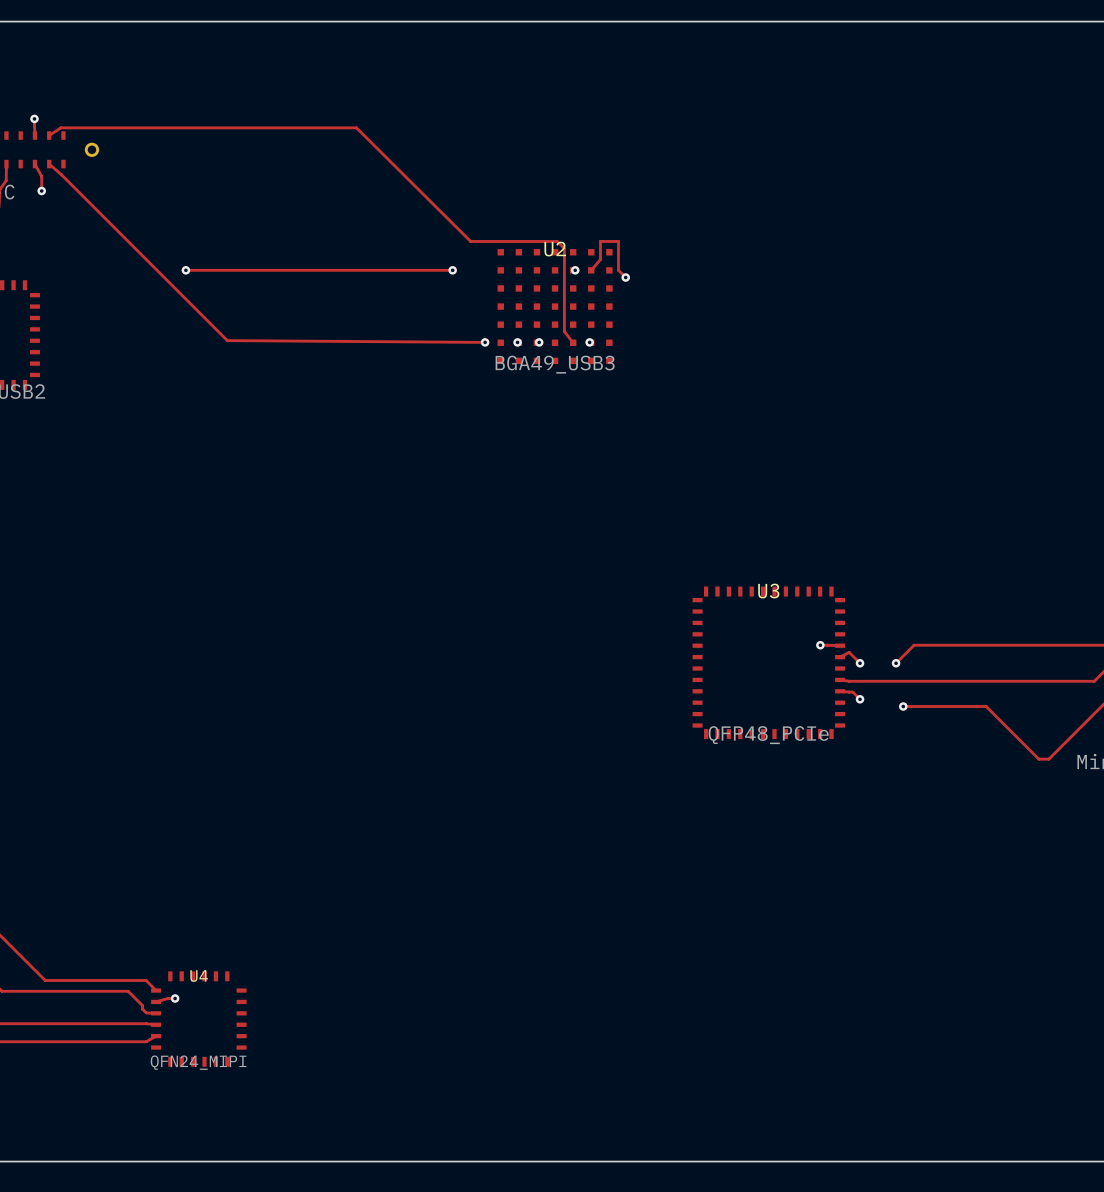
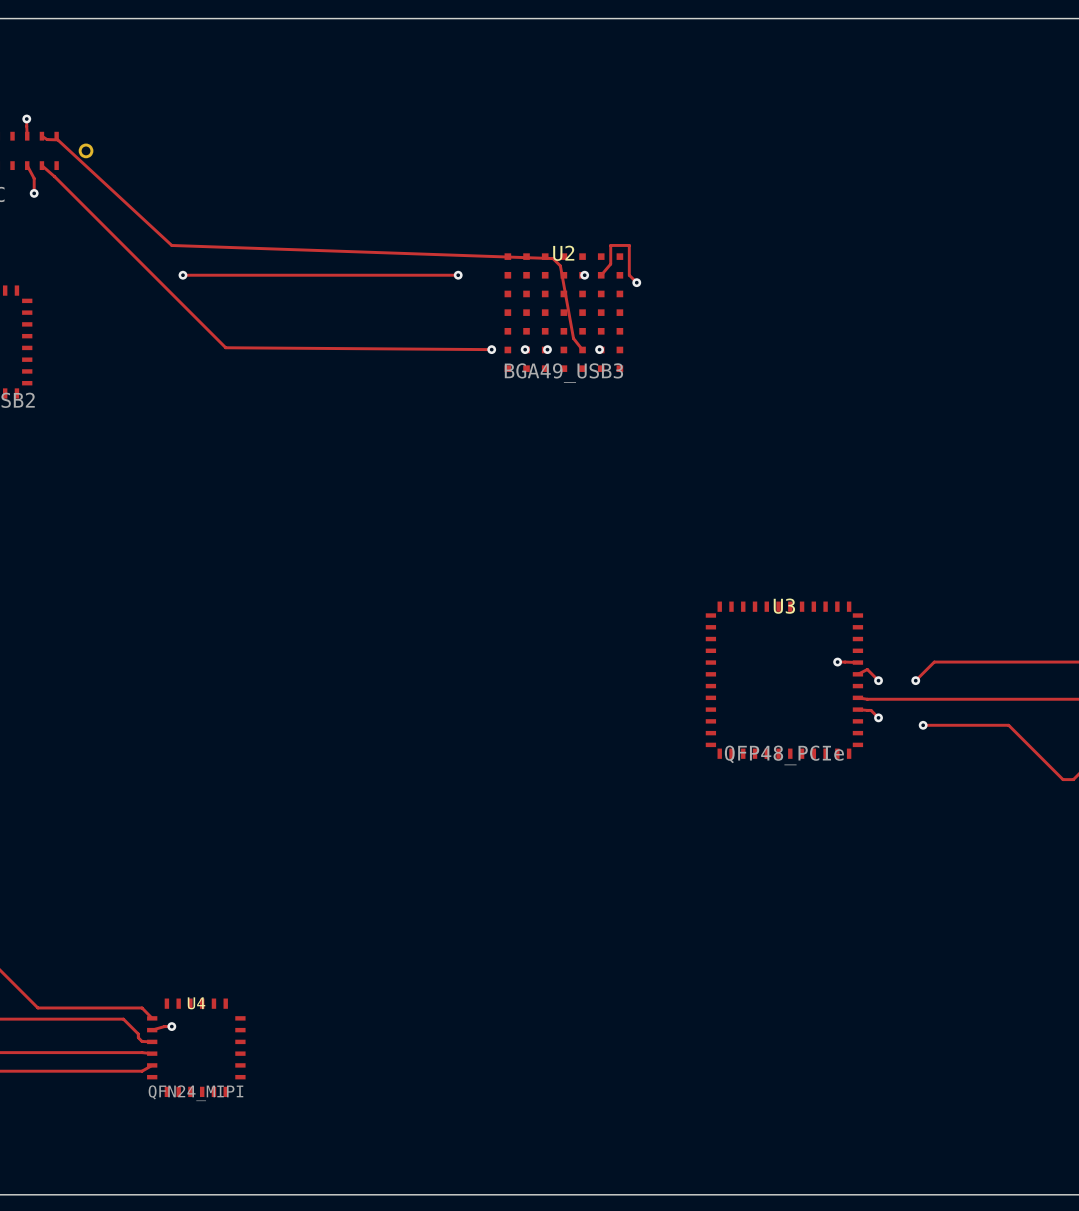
track: (49, 135) (60, 127) (356, 127) (470, 241) (557, 241) (564, 248) (564, 331) -> (41, 136) (47, 139) (57, 139) (171, 245) (553, 258) (560, 265) (573, 338)

